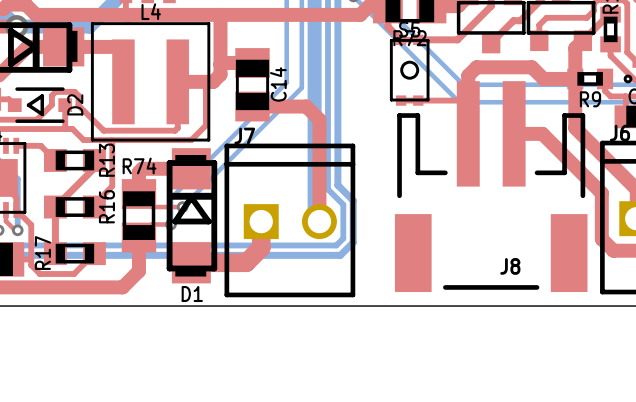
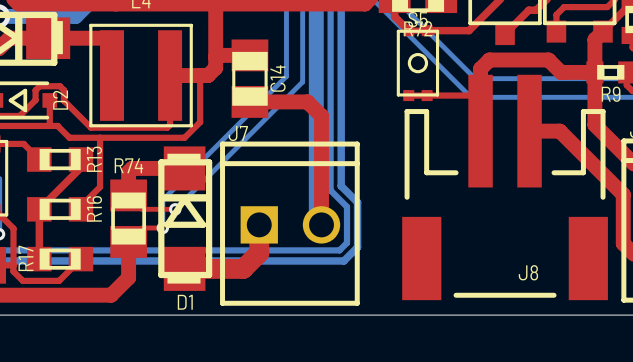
L4 footprint: [90, 22, 211, 142] -> [89, 23, 193, 128]

